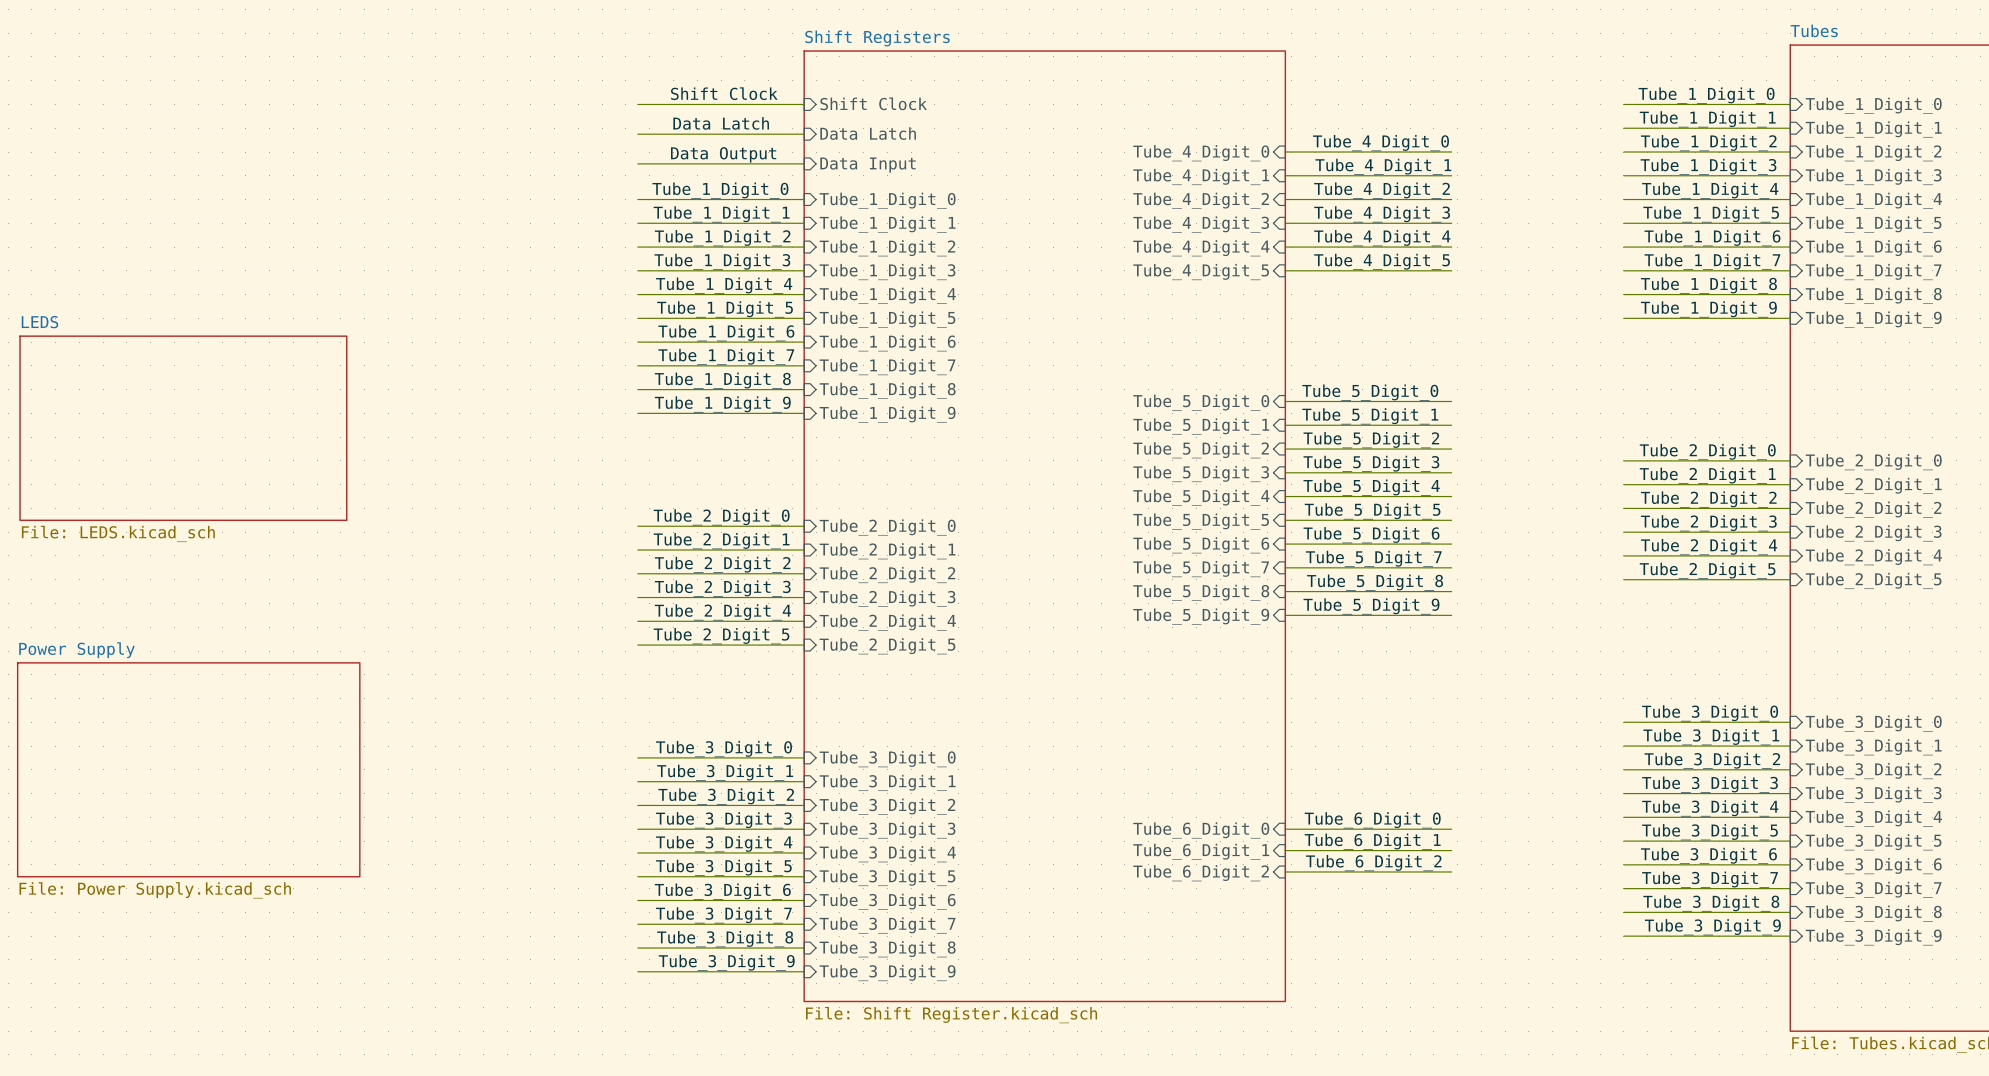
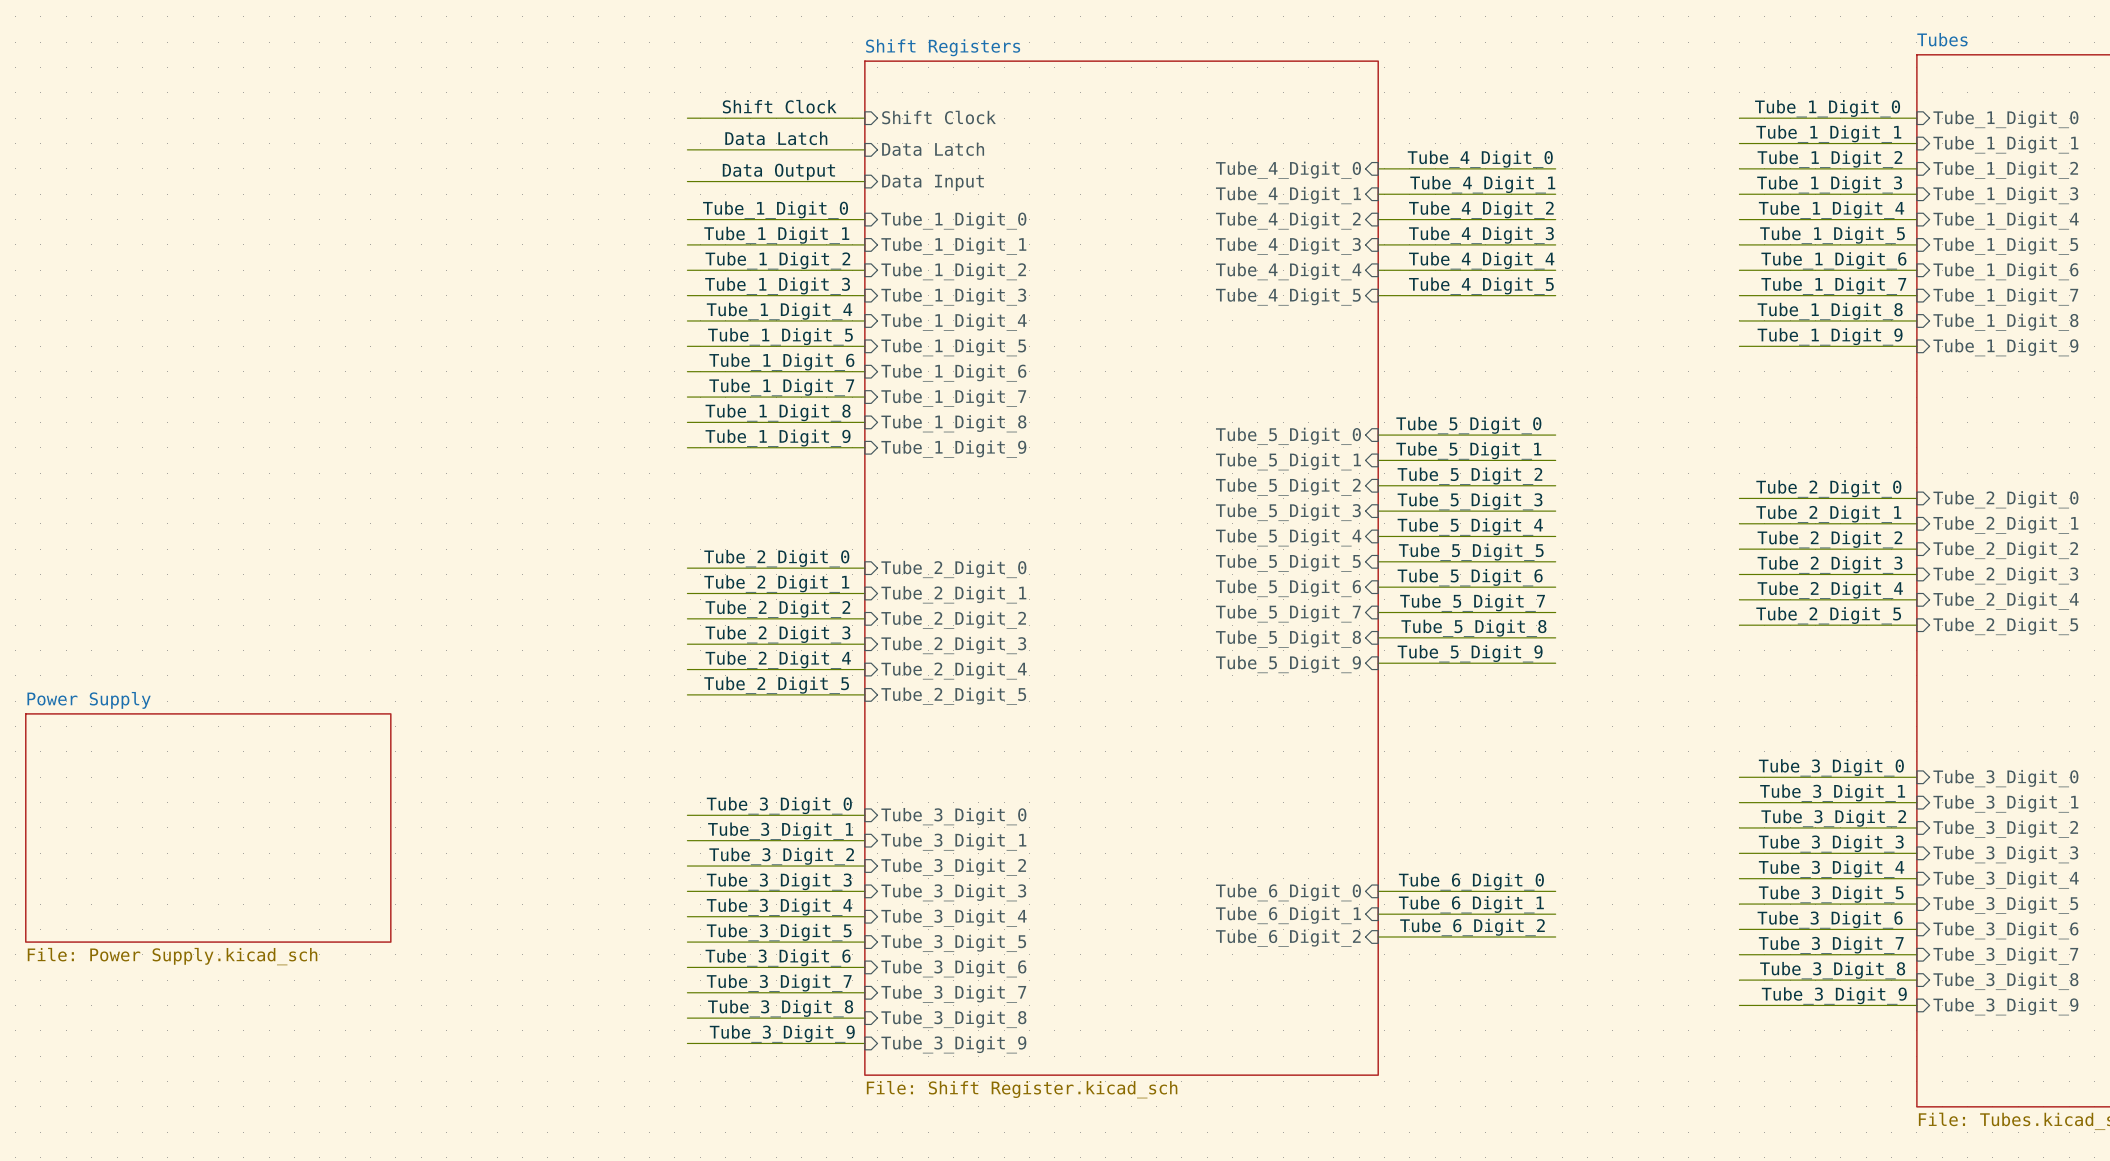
sheet LEDS: File: LEDS.kicad_sch (183, 428) -> none

